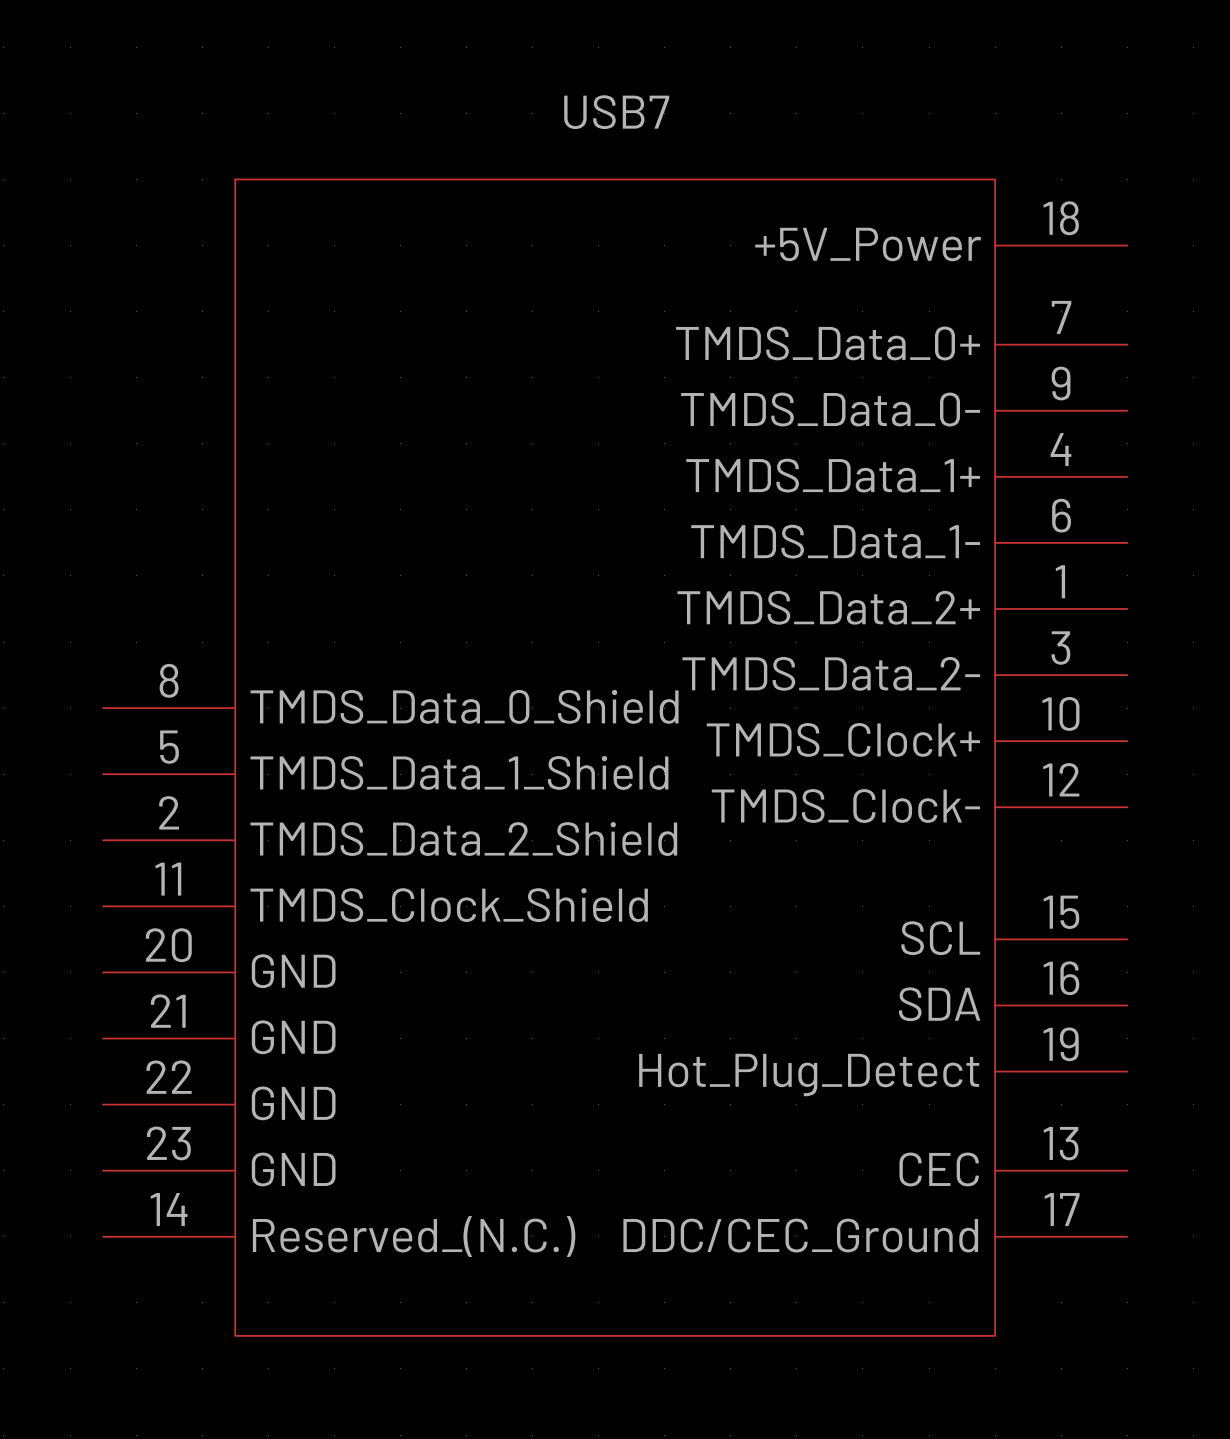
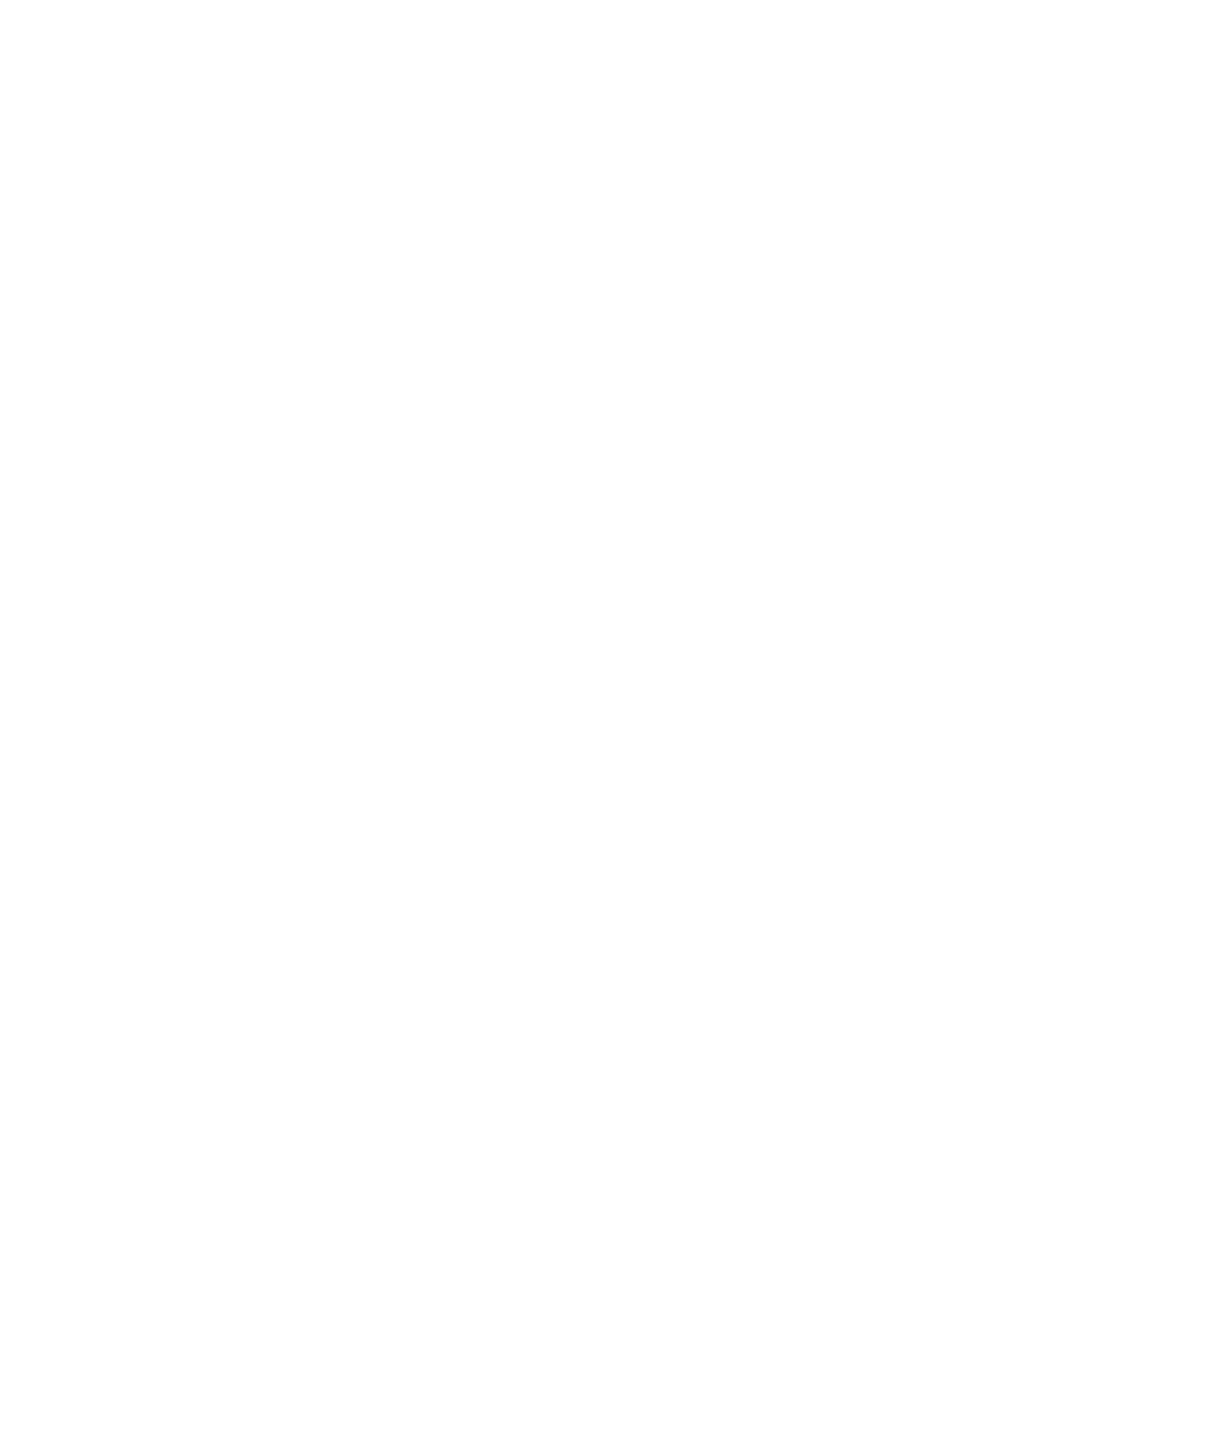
USB7: (615, 757) -> none

